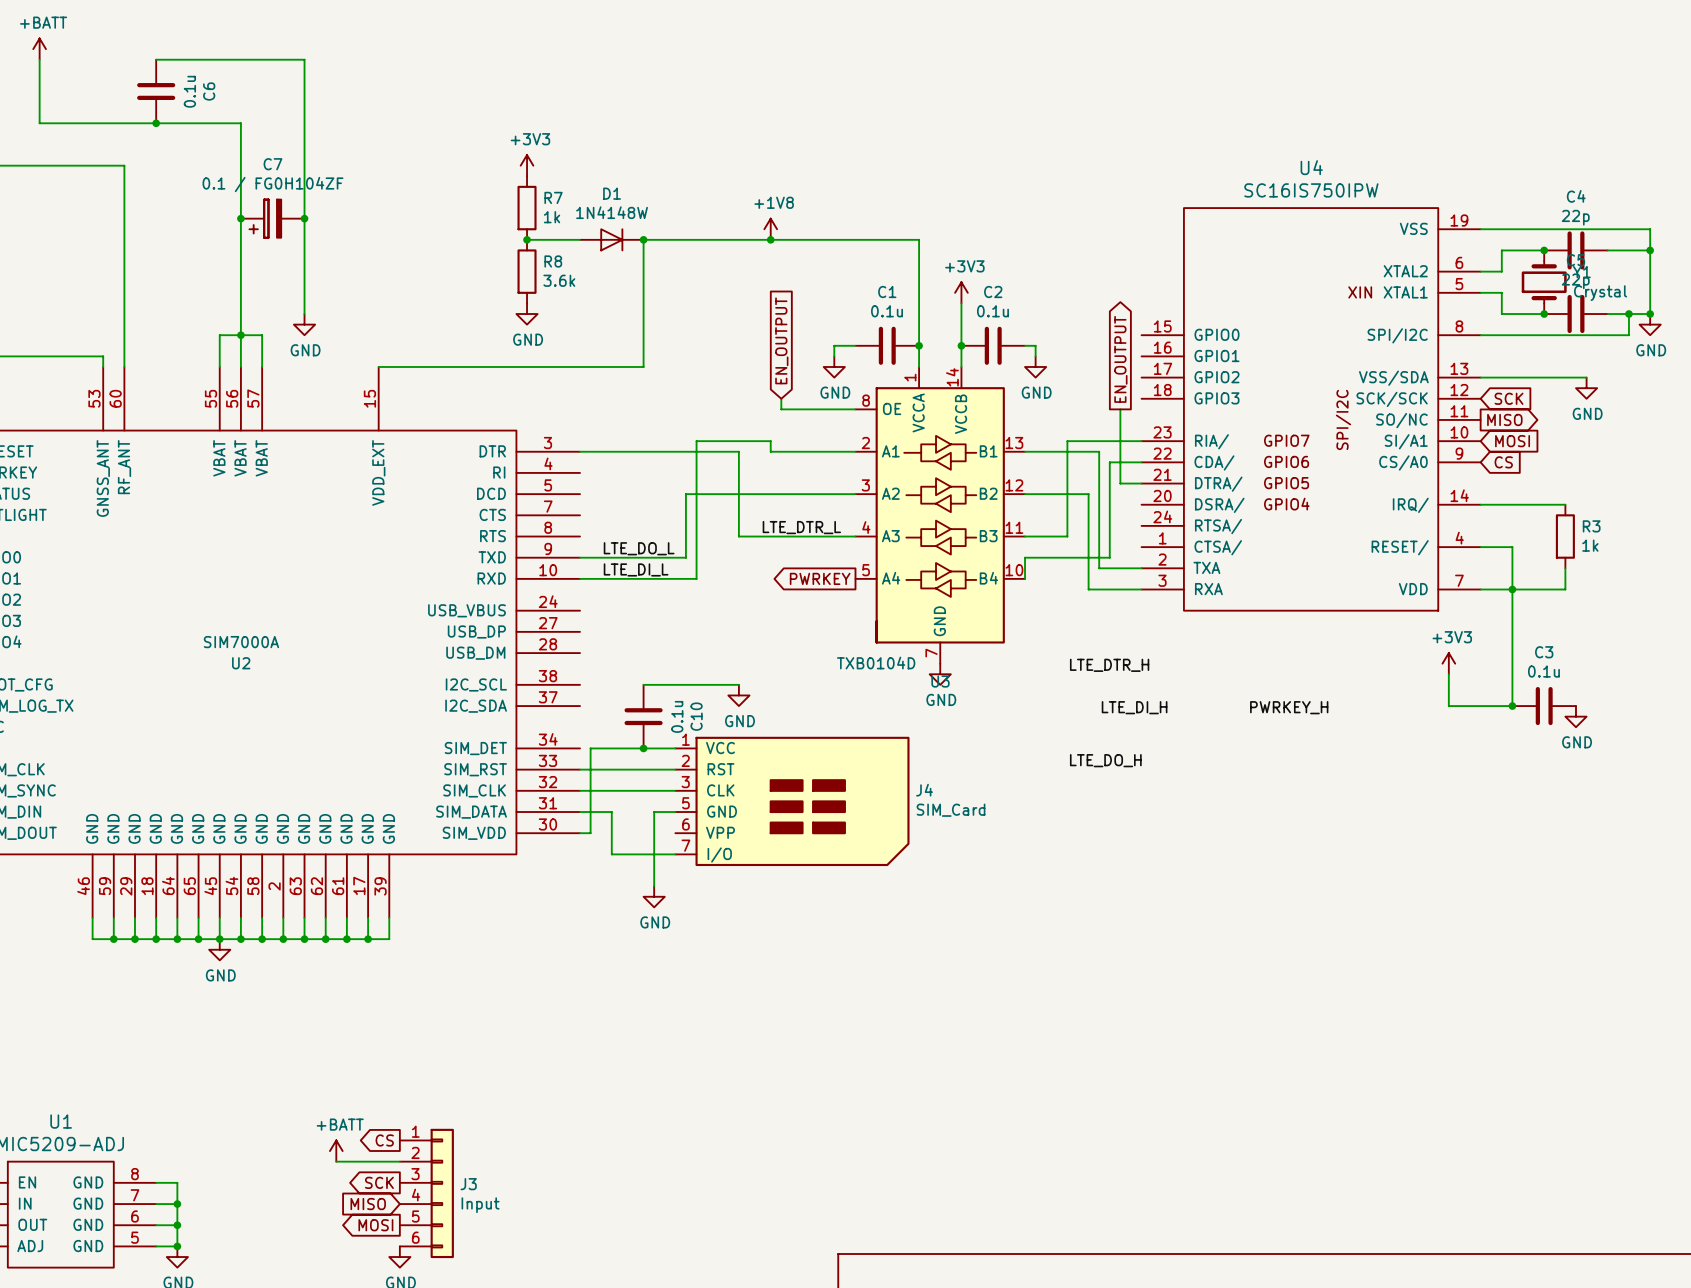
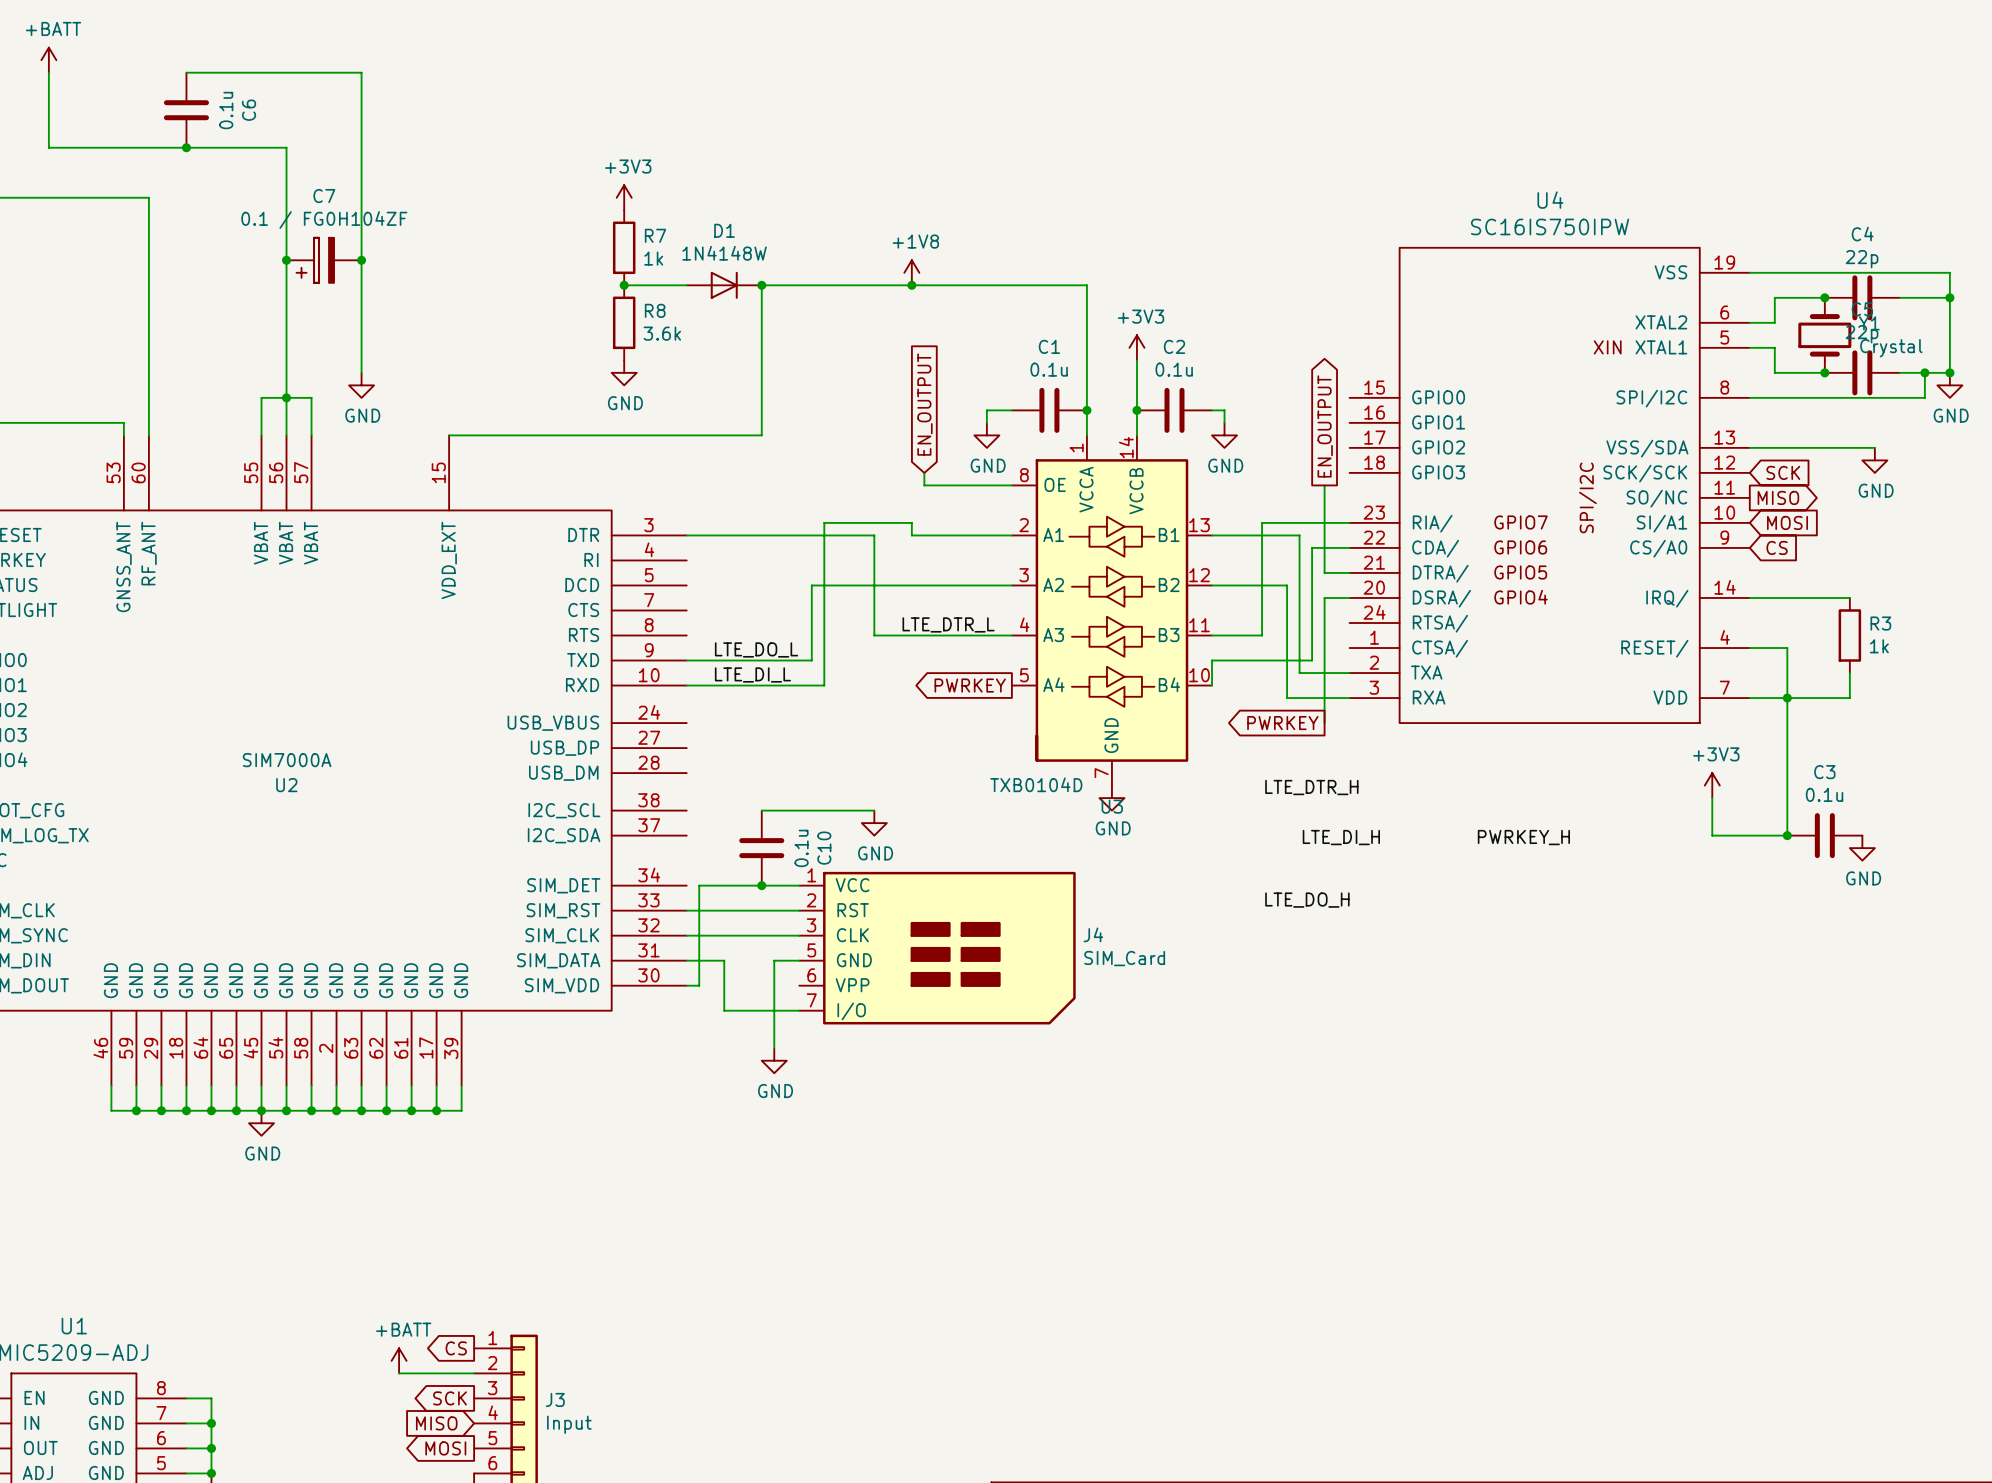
wire: none -> (1349, 597) (1324, 597) (1324, 723)
global label: none -> PWRKEY (1282, 723)

